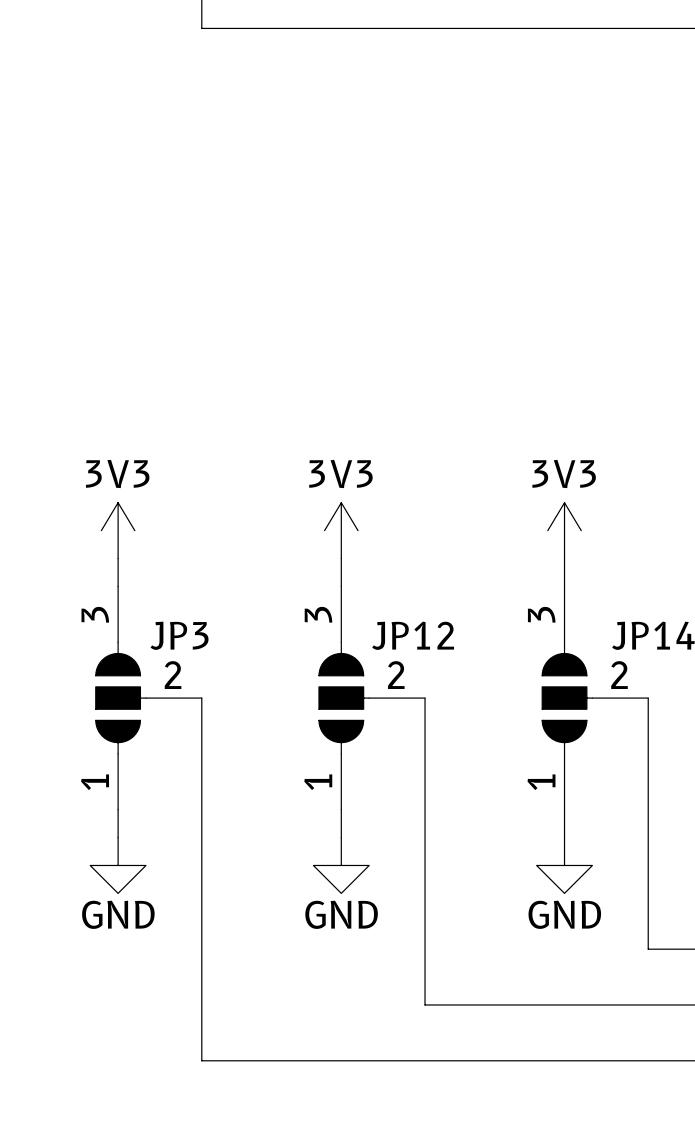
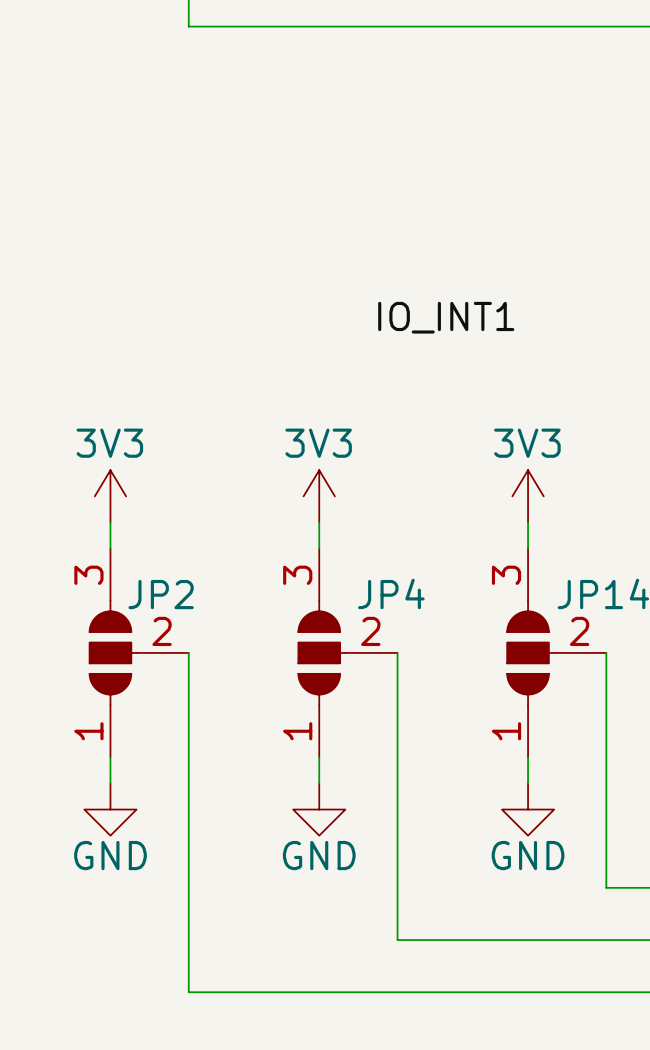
label: none -> IO_INT1 (446, 317)
JP3 name: JP3 (179, 635) -> JP2 (161, 594)
JP12 name: JP12 (413, 635) -> JP4 (391, 593)

